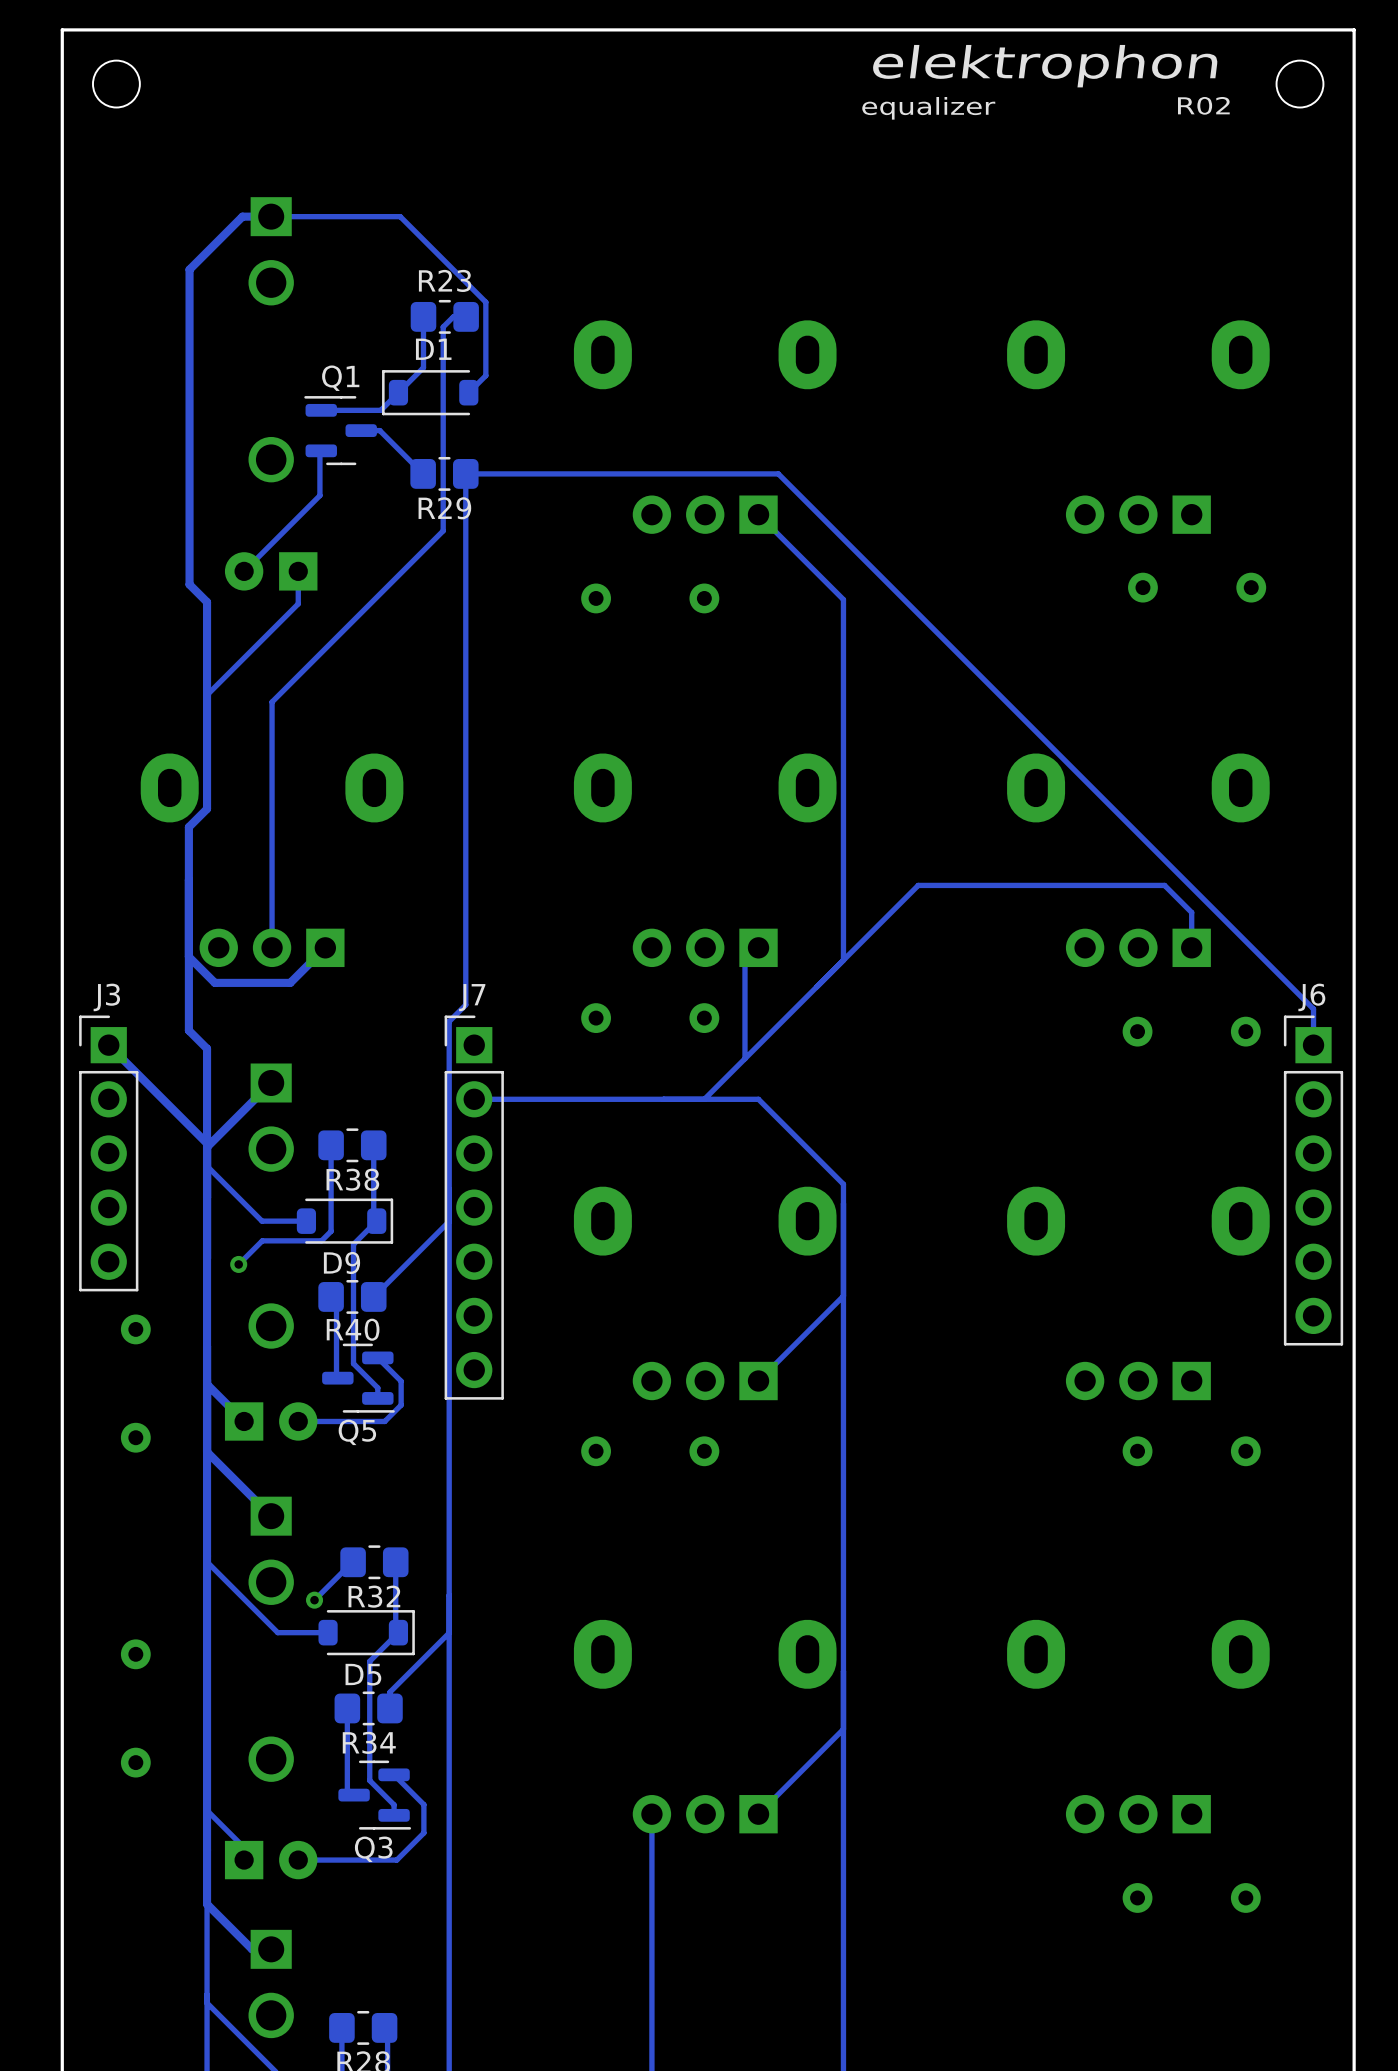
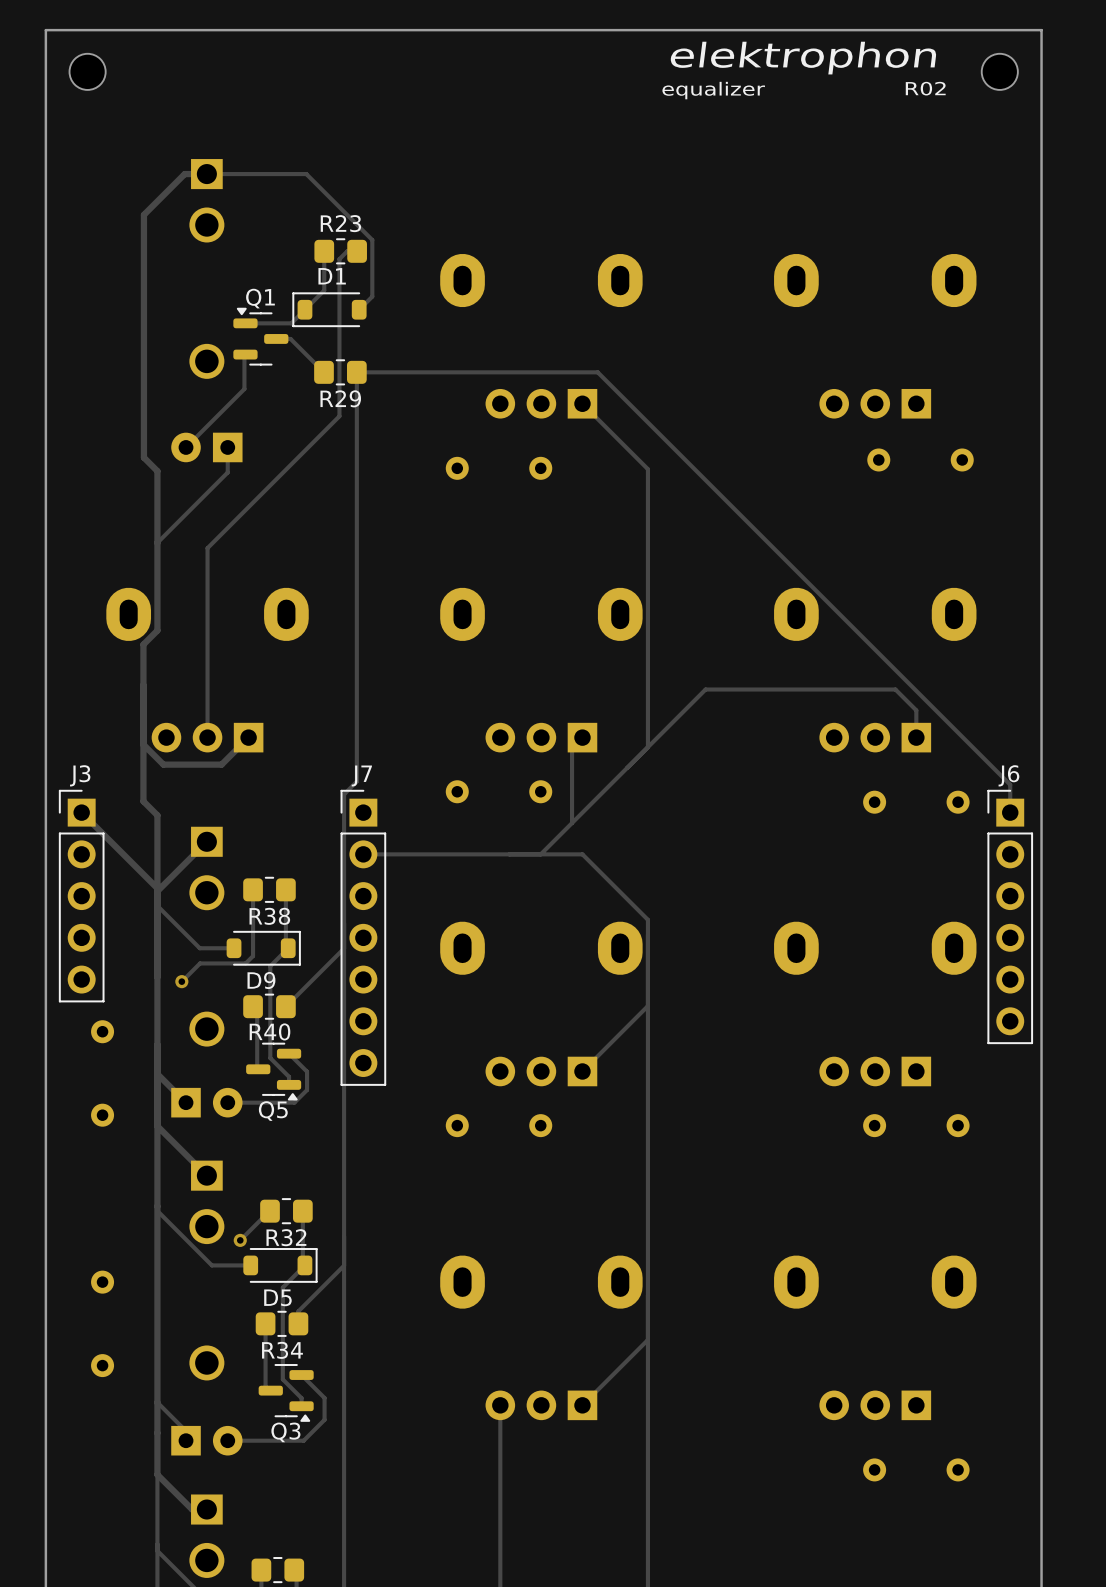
Q1 footprint: [304, 396, 377, 466] -> [233, 307, 289, 366]
Q5 footprint: [322, 1343, 395, 1413] -> [246, 1042, 302, 1101]
Q3 footprint: [338, 1760, 412, 1830] -> [258, 1364, 314, 1422]

